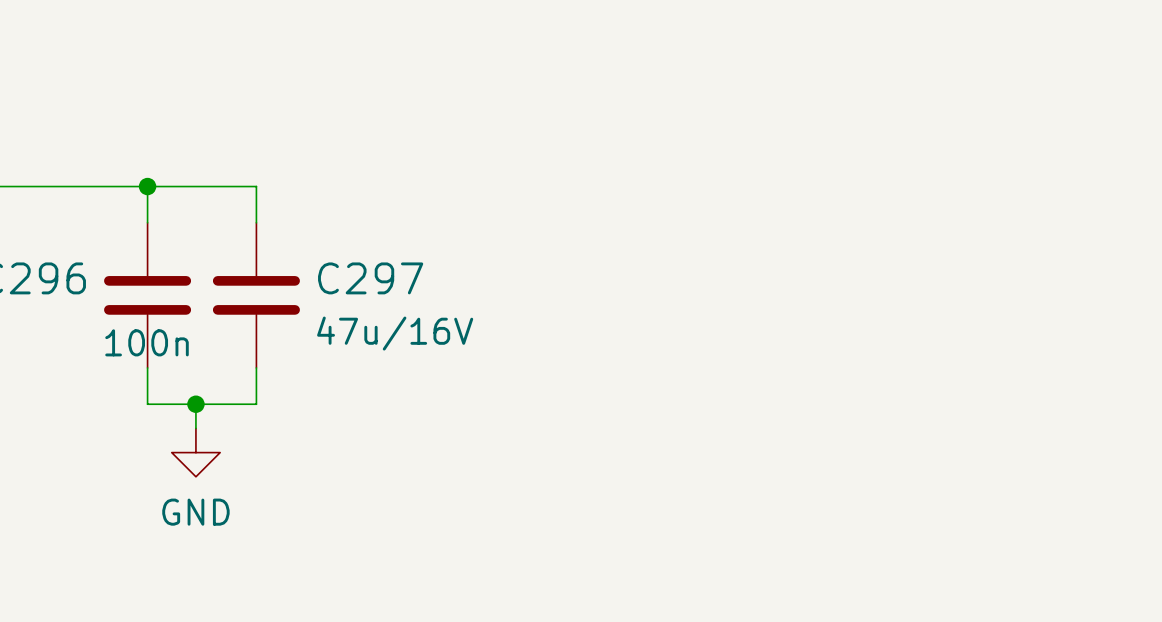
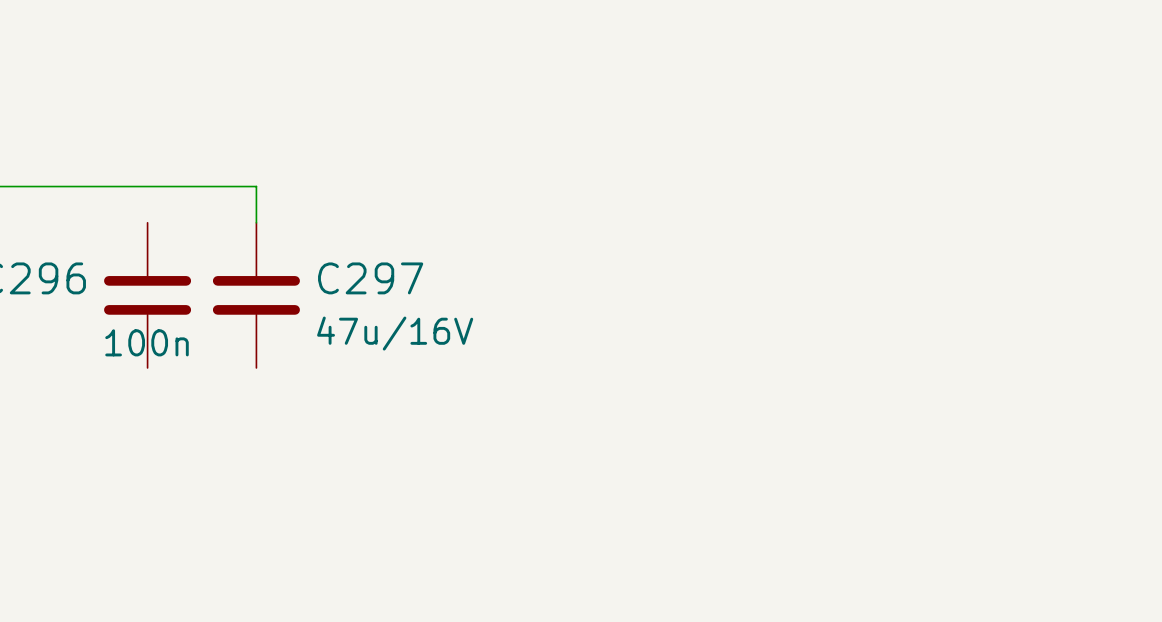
wire: (147, 186) (147, 222) -> none
junction: (147, 186) -> none
wire: (147, 367) (147, 404) (256, 404) (256, 367) -> none
wire: (195, 404) (195, 428) -> none
junction: (195, 404) -> none
power symbol: GND (195, 452) -> none

